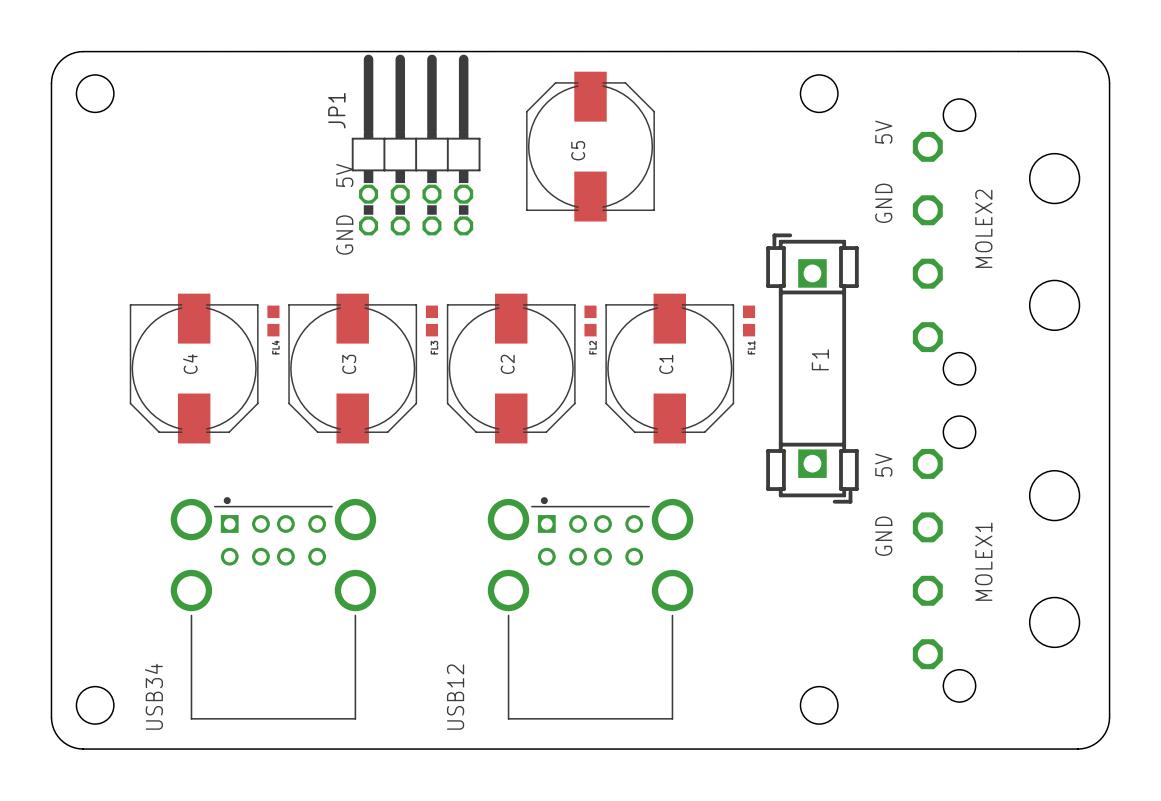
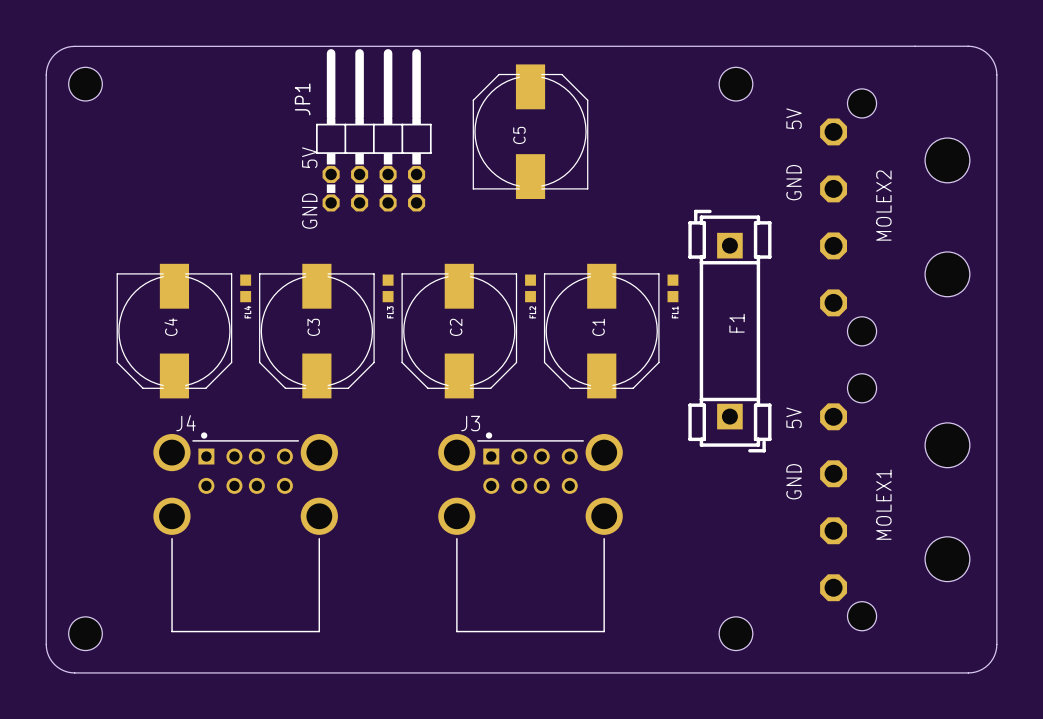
J4: none -> (245, 532)
J3: none -> (530, 532)
USB34: (273, 608) -> none
USB12: (590, 608) -> none

